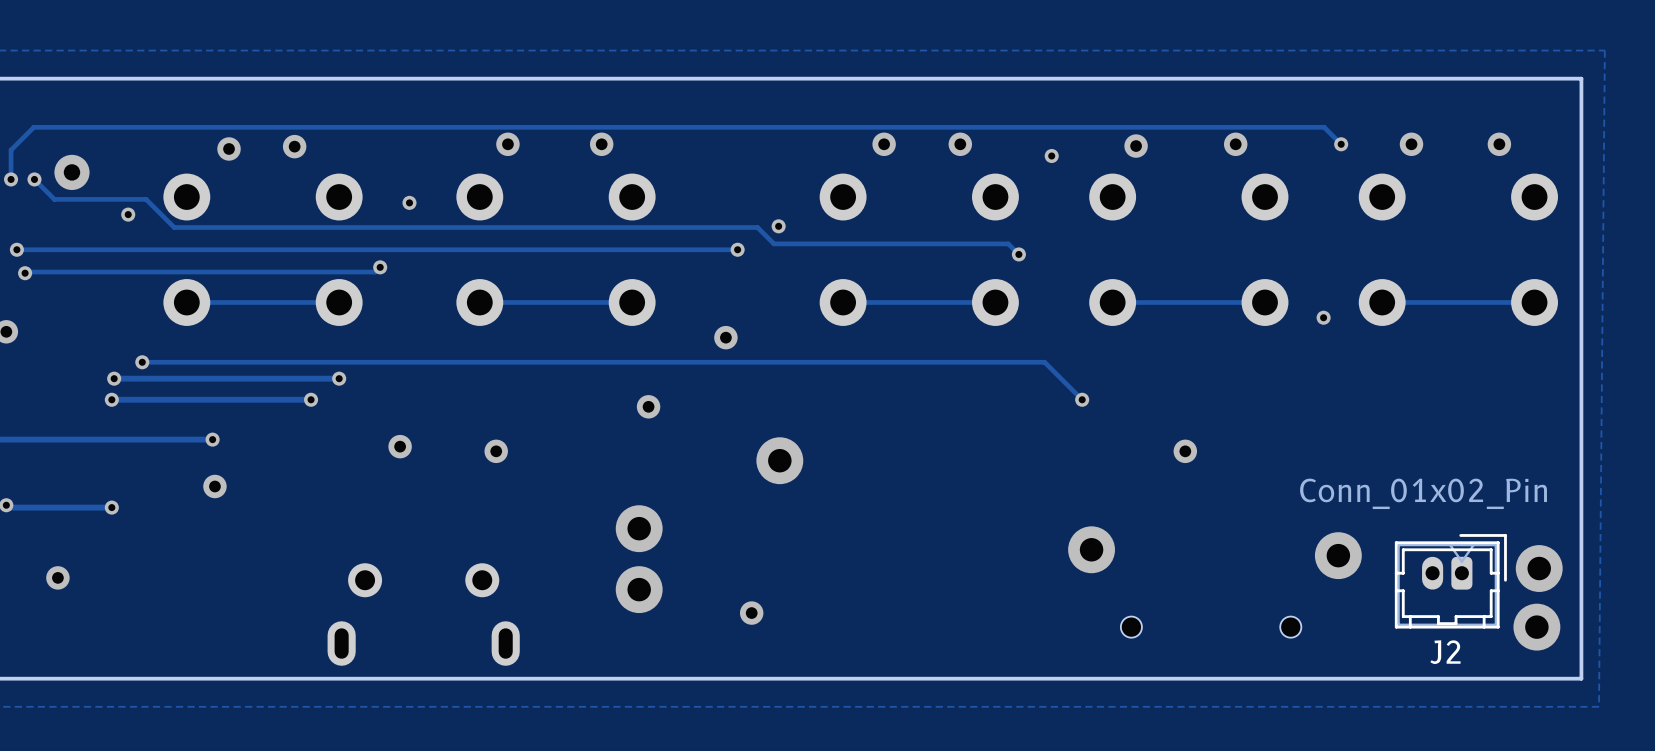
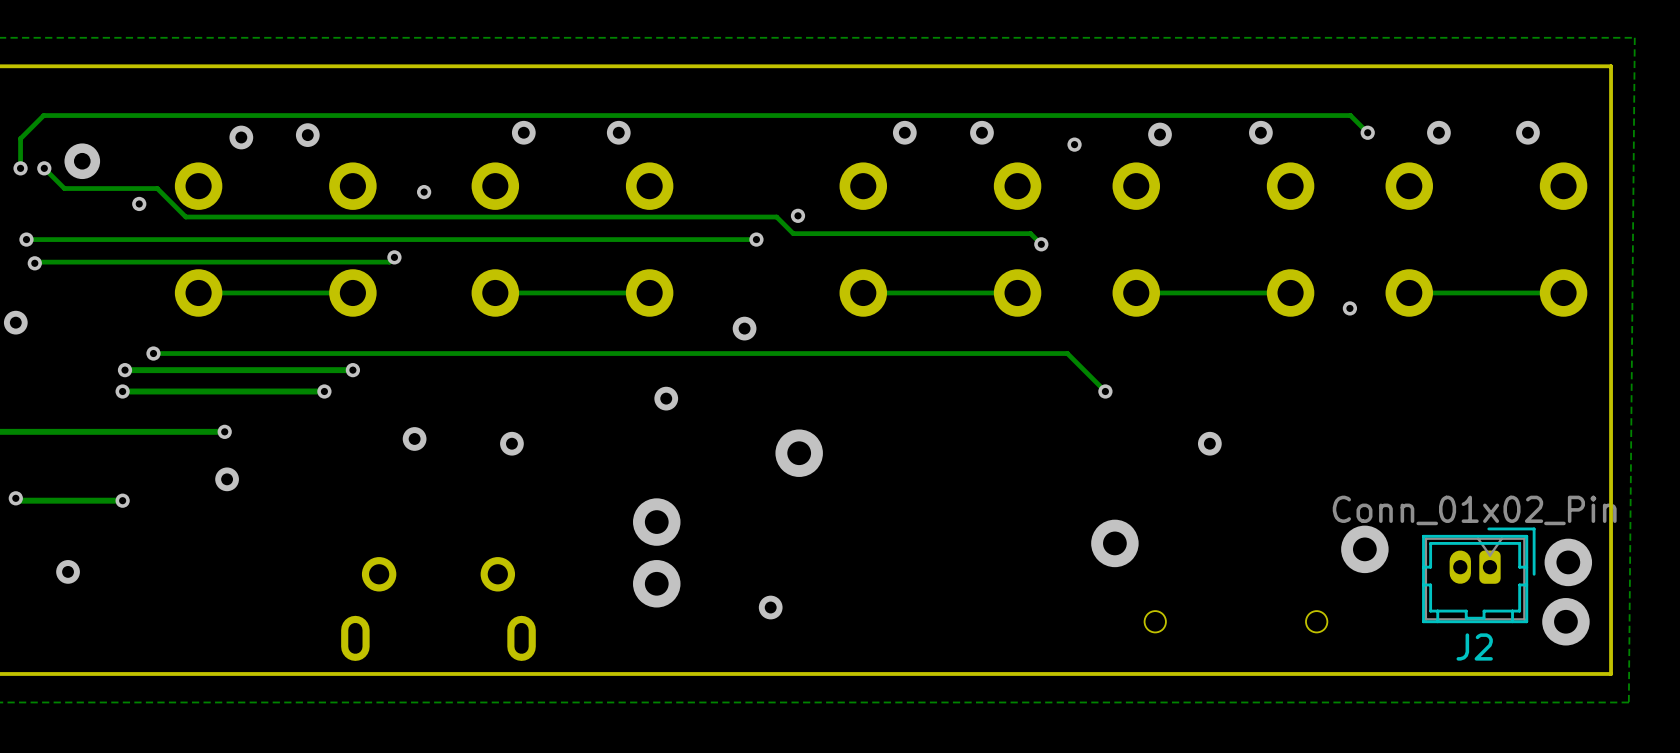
J2 value position: Conn_01x02_Pin (1423, 493) -> Conn_01x02_Pin (1474, 510)

